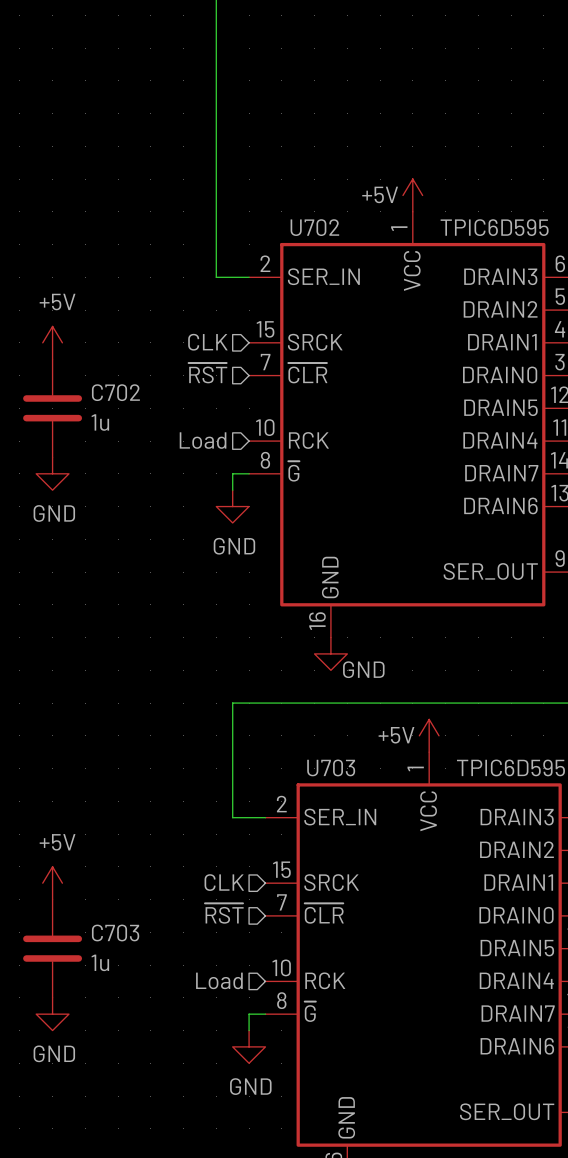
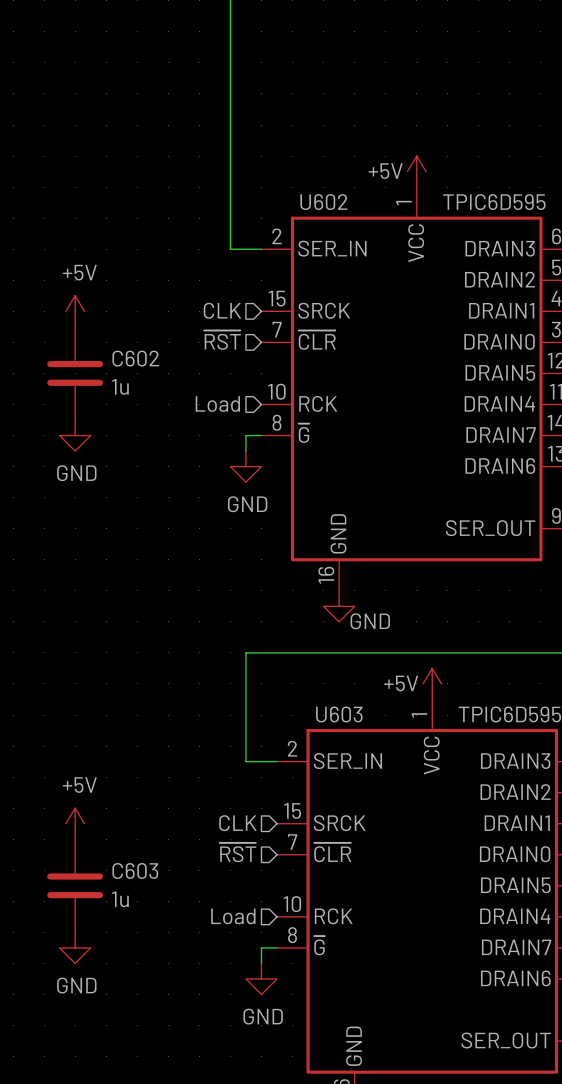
U702 name: U702 (314, 227) -> U602 (323, 202)
C702 name: C702 (115, 392) -> C602 (135, 358)
U703 name: U703 (331, 767) -> U603 (339, 714)
C703 name: C703 (115, 933) -> C603 (135, 870)

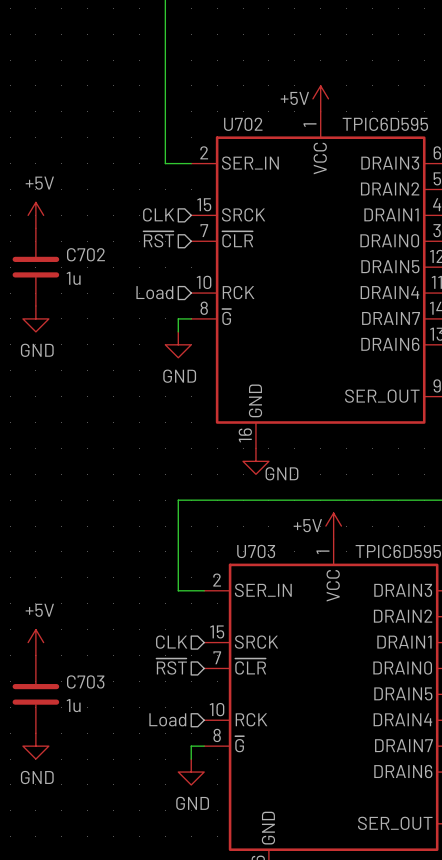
U602 name: U602 (323, 202) -> U702 (243, 124)
C602 name: C602 (135, 358) -> C702 (85, 254)
U603 name: U603 (339, 714) -> U703 (256, 551)
C603 name: C603 (135, 870) -> C703 (85, 681)

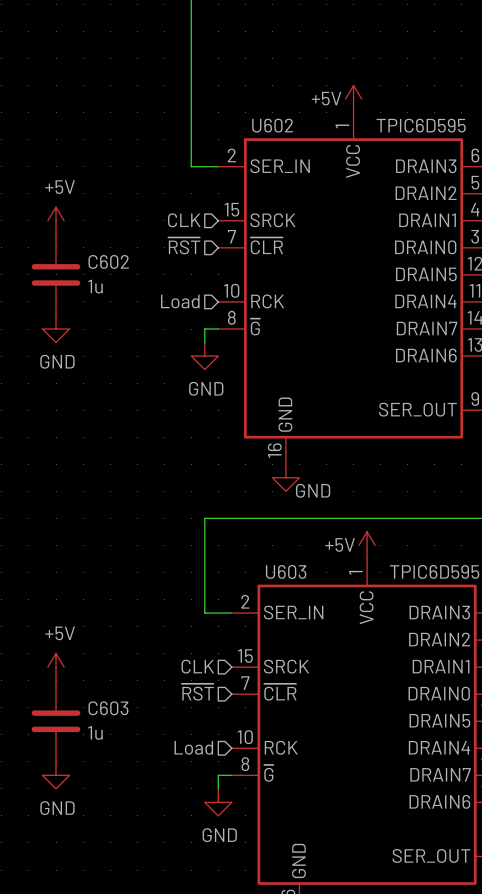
U702 name: U702 (243, 124) -> U602 (272, 125)
C702 name: C702 (85, 254) -> C602 (108, 261)
U703 name: U703 (256, 551) -> U603 (286, 571)
C703 name: C703 (85, 681) -> C603 (108, 708)

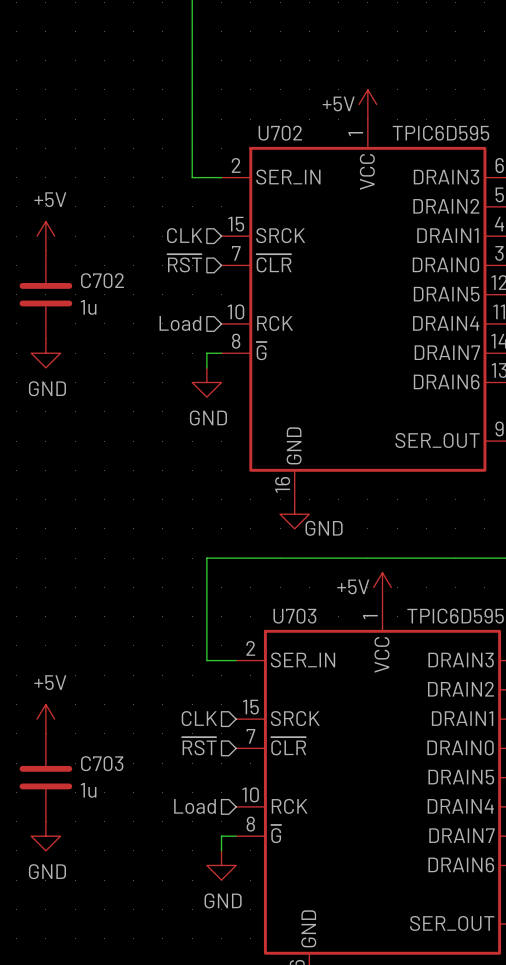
U602 name: U602 (272, 125) -> U702 (280, 133)
C602 name: C602 (108, 261) -> C702 (102, 280)
U603 name: U603 (286, 571) -> U703 (294, 616)
C603 name: C603 (108, 708) -> C703 (102, 763)

